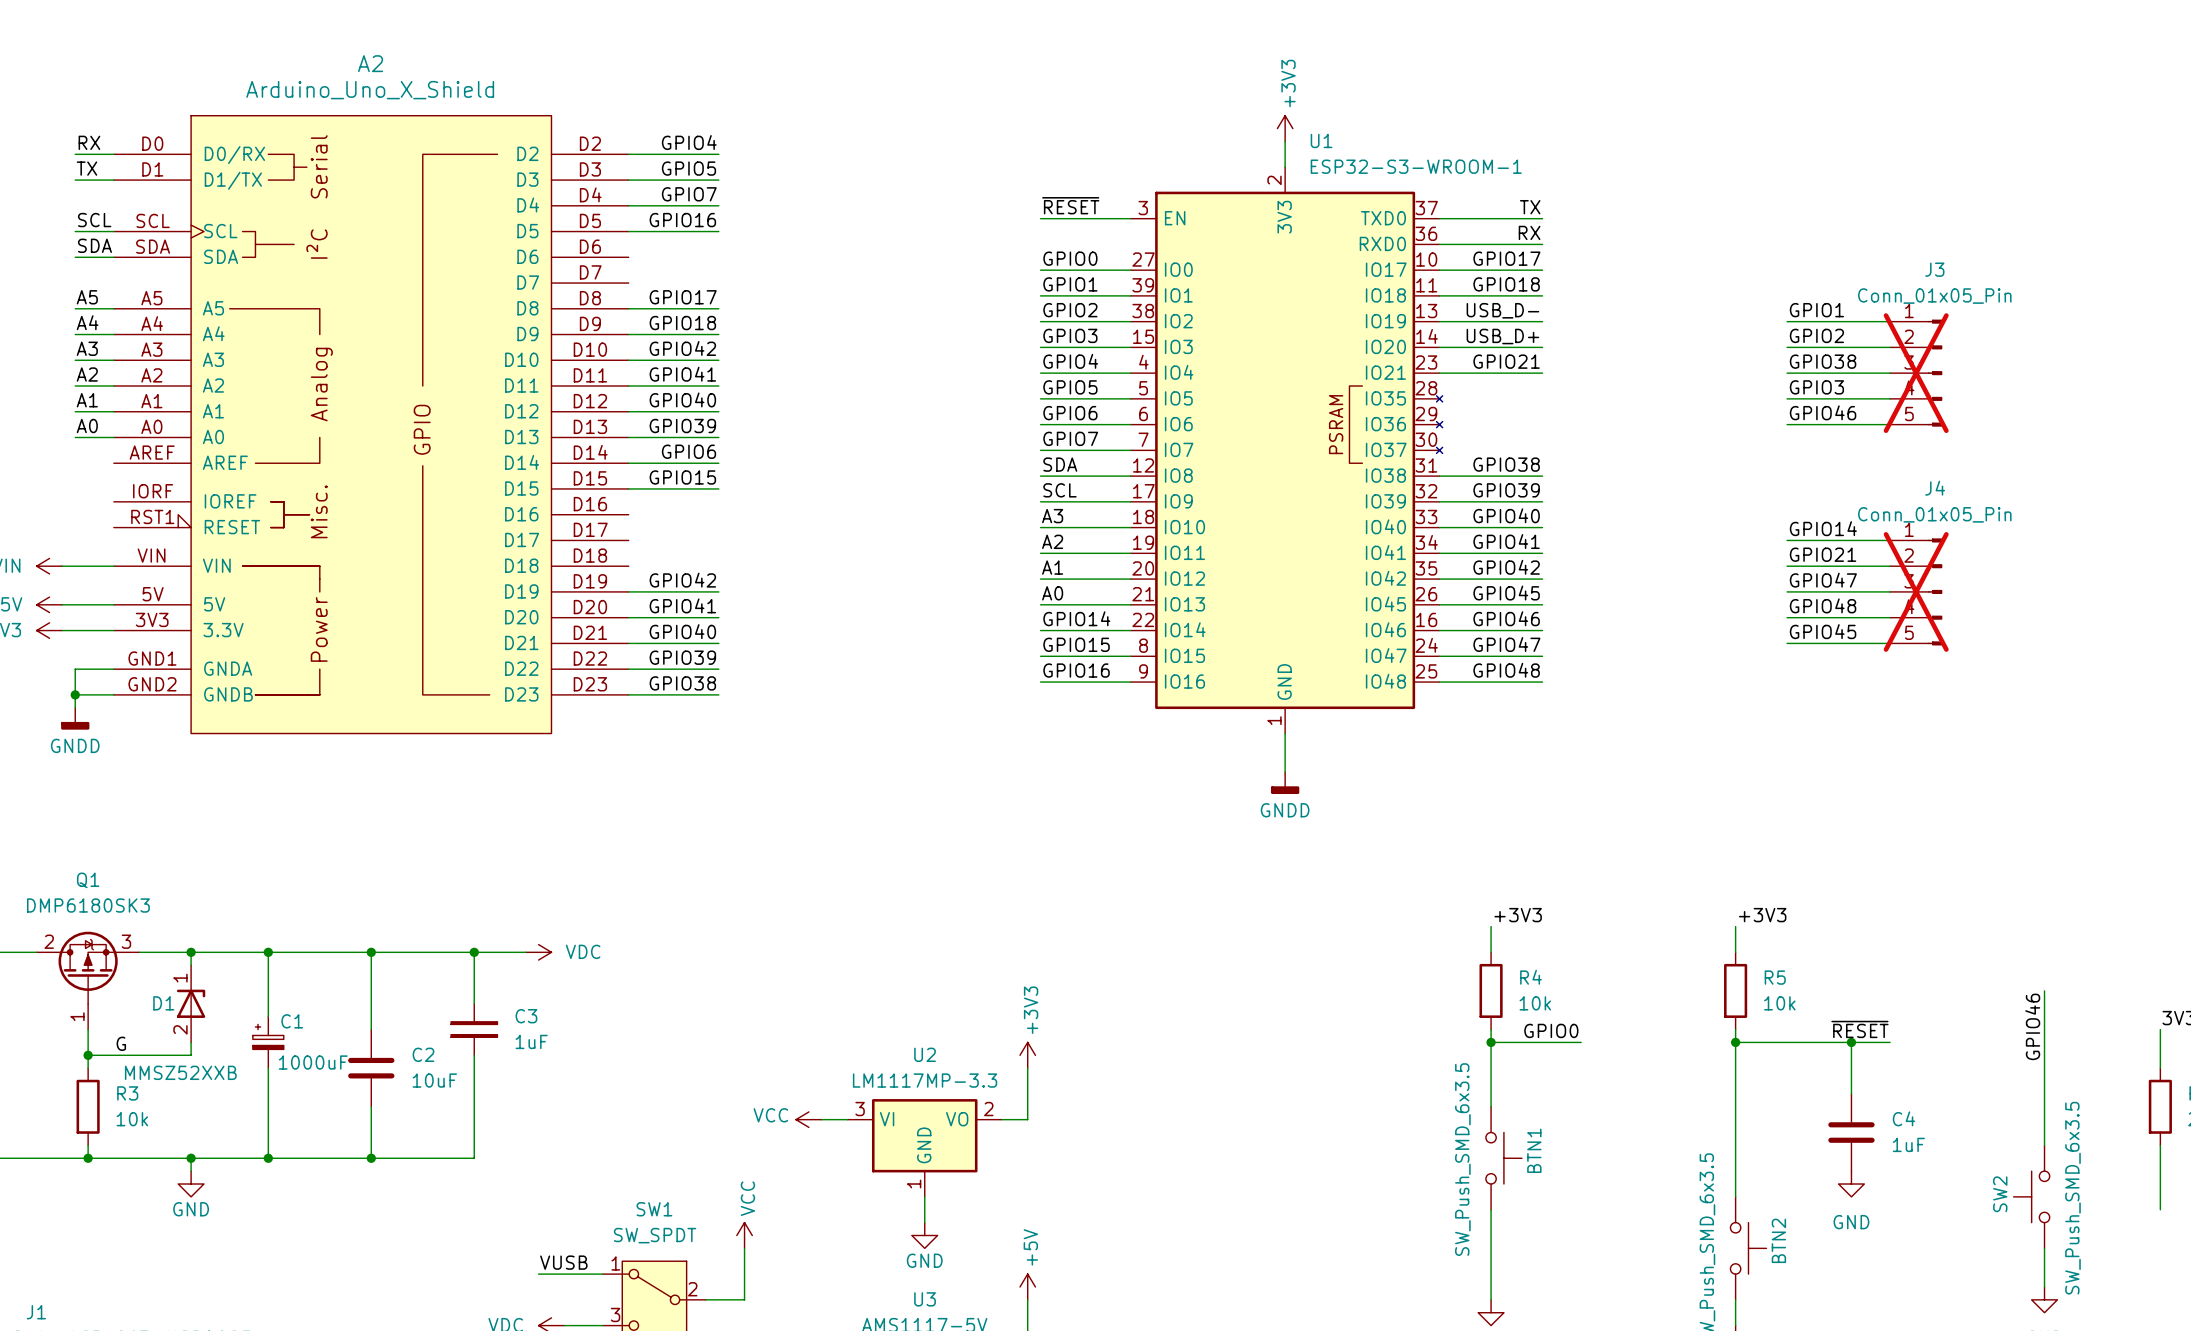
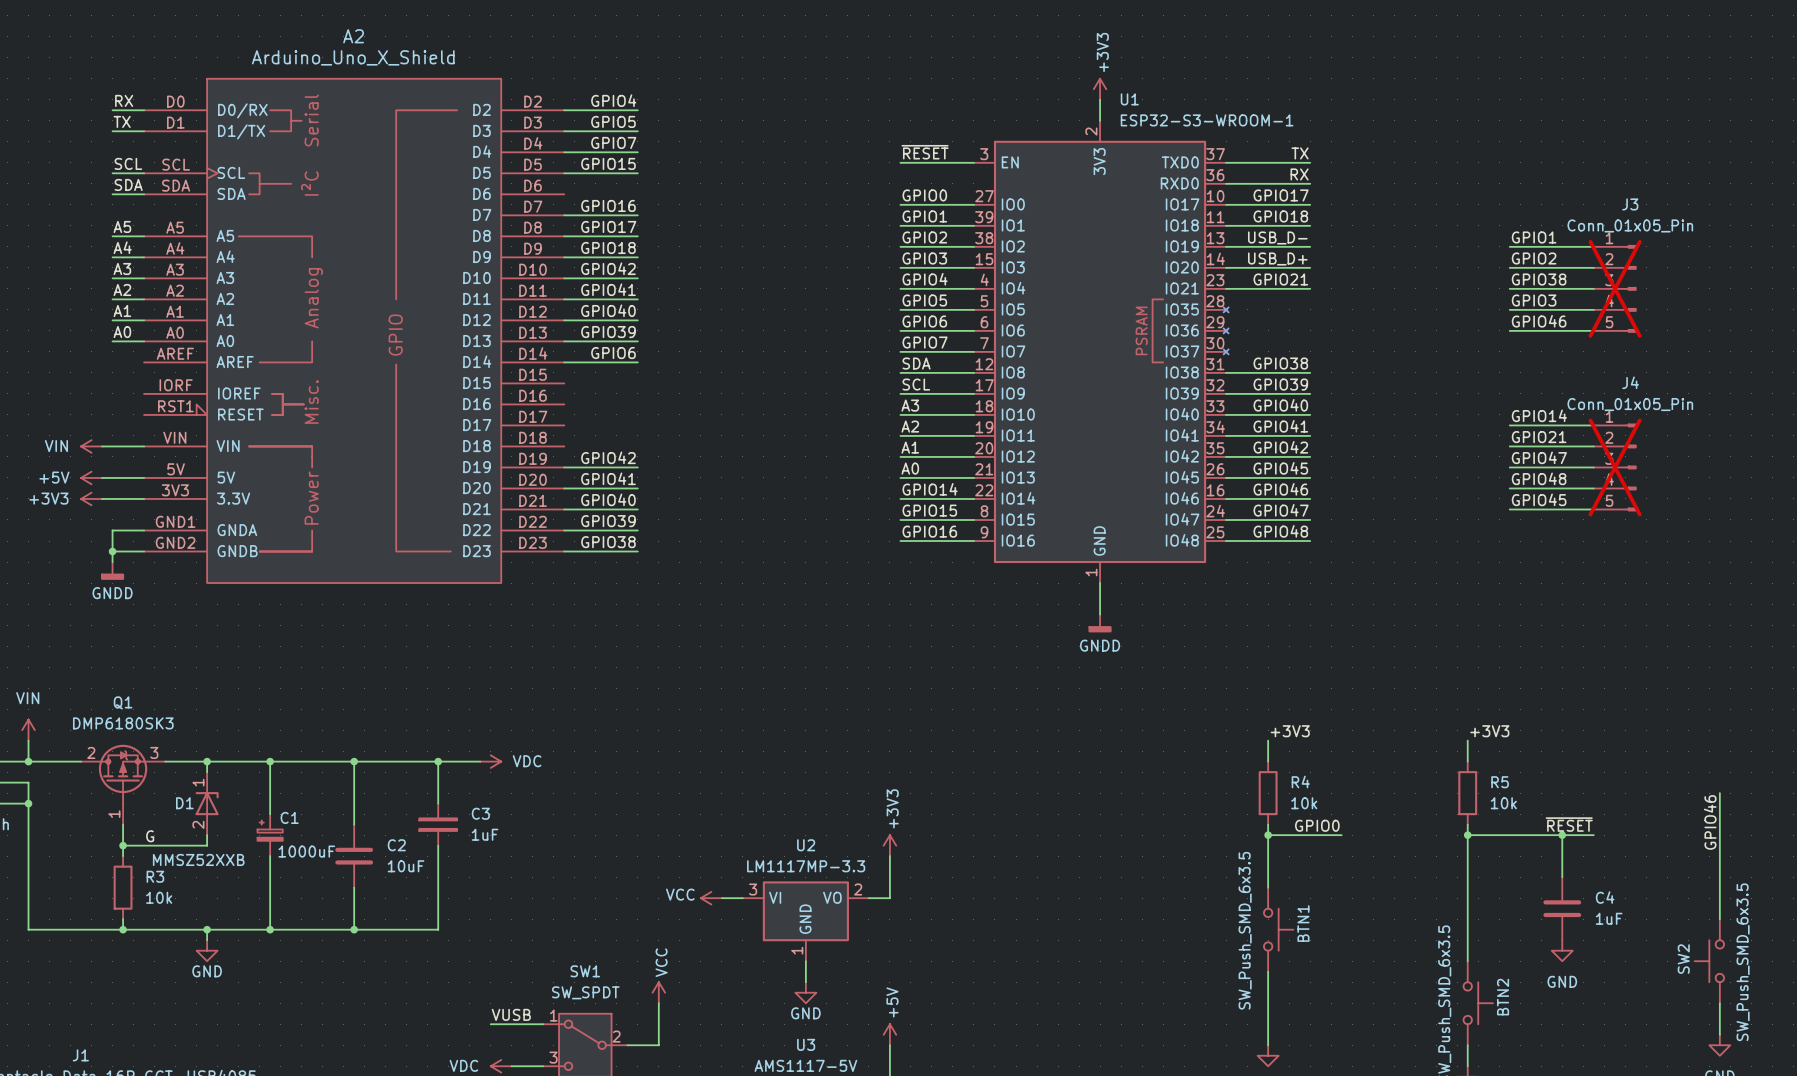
label: GPIO16 (682, 220) -> GPIO15 (608, 163)
label: none -> GPIO16 (608, 205)
label: GPIO15 (682, 477) -> none
wire: (628, 488) (718, 488) -> (564, 215) (637, 215)

